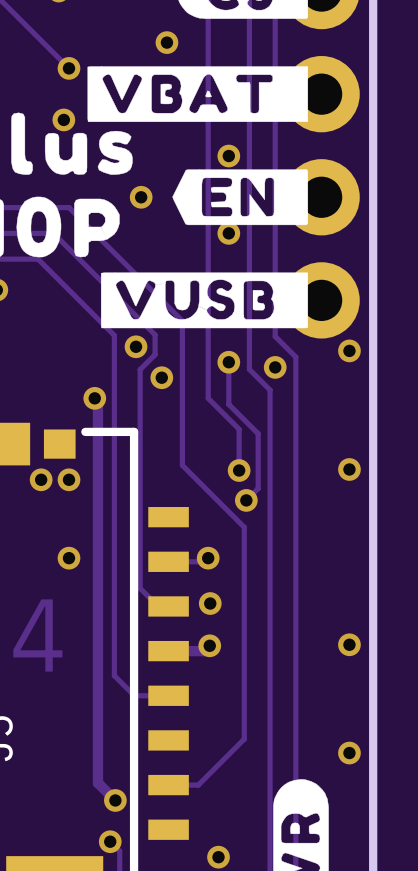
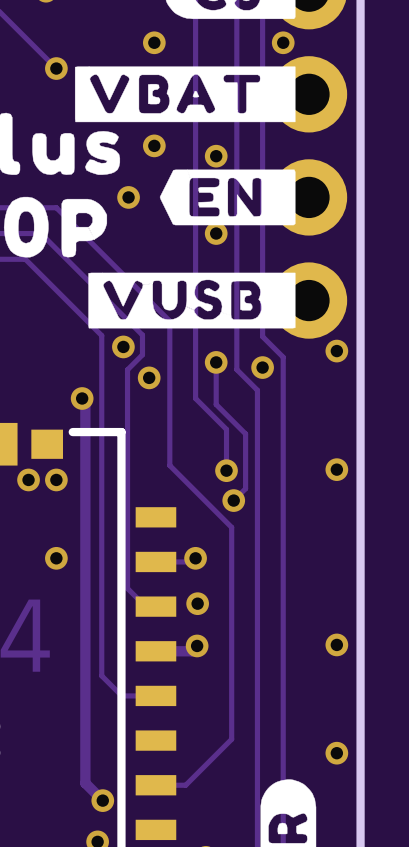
via: none -> (283, 42)
via position: (63, 119) -> (154, 145)

